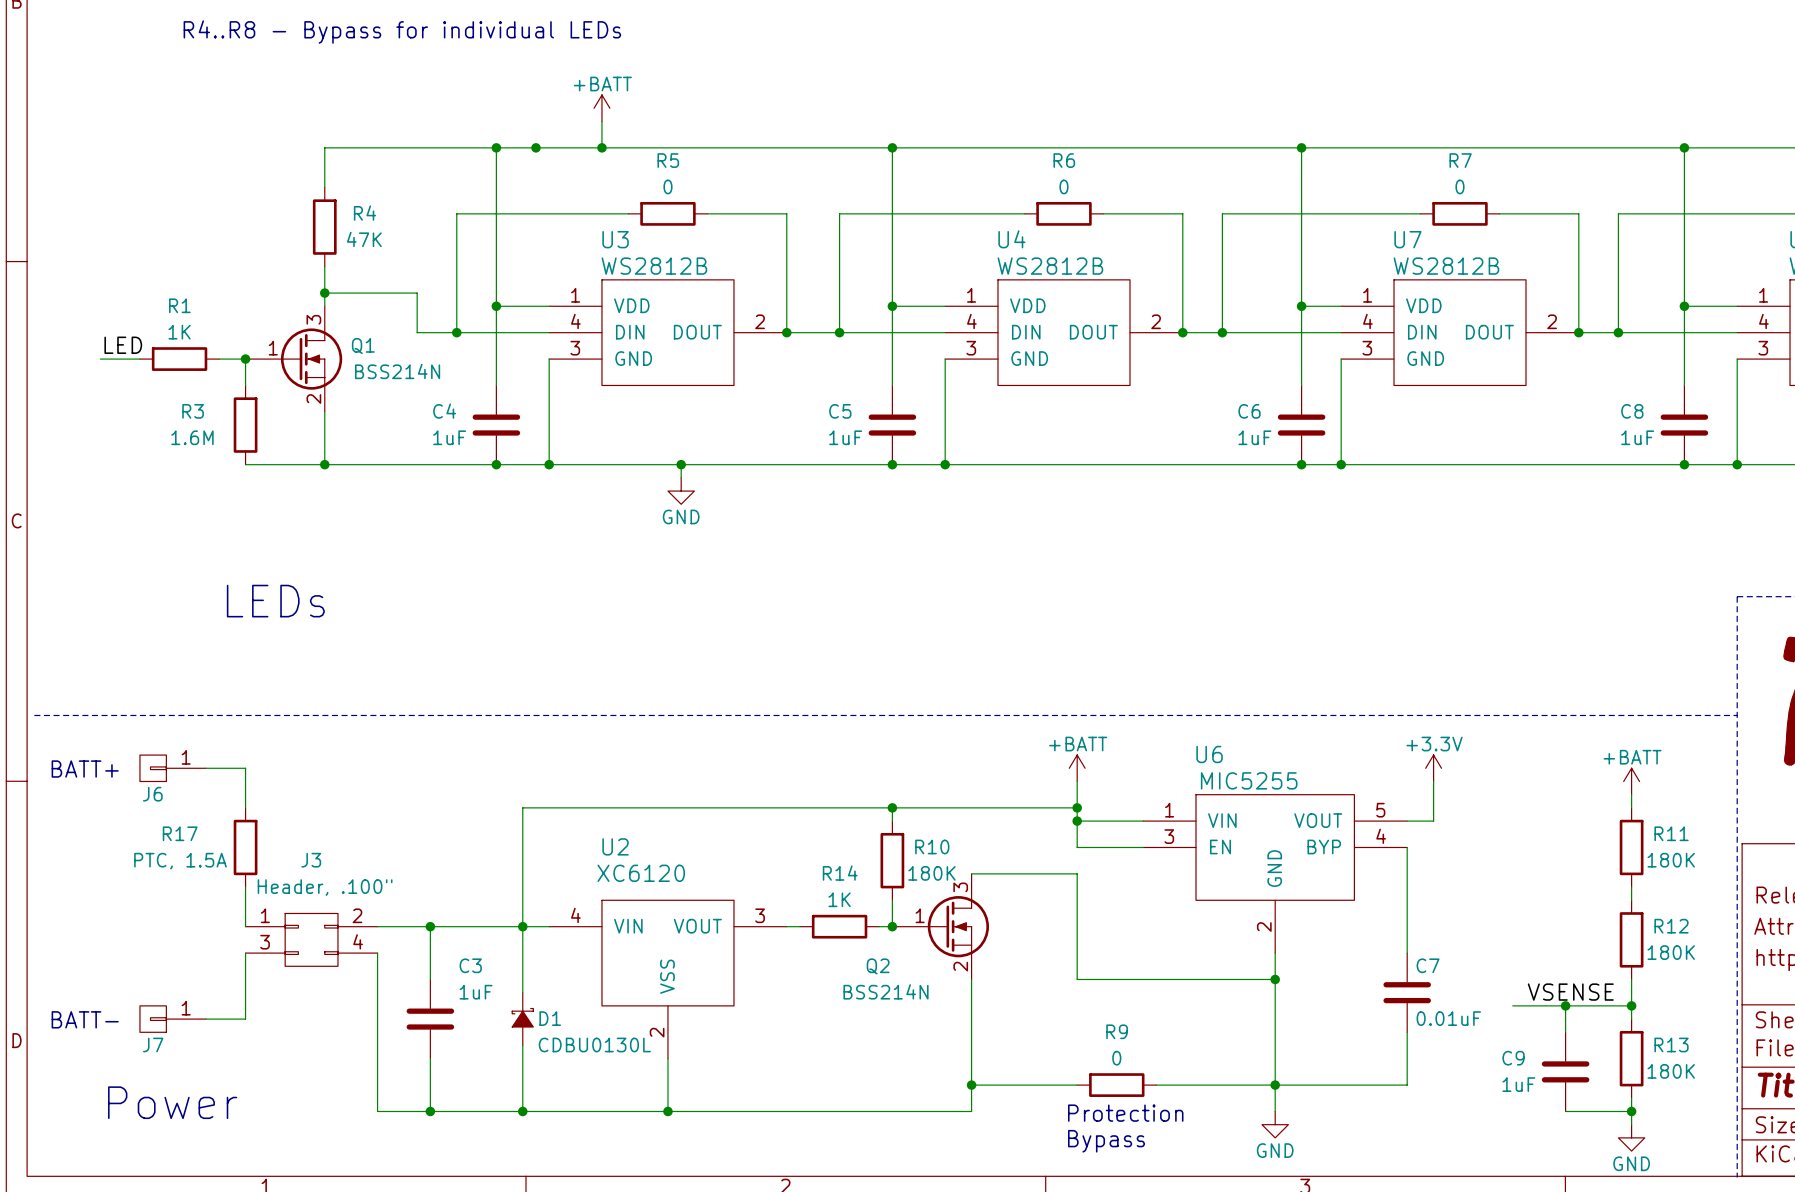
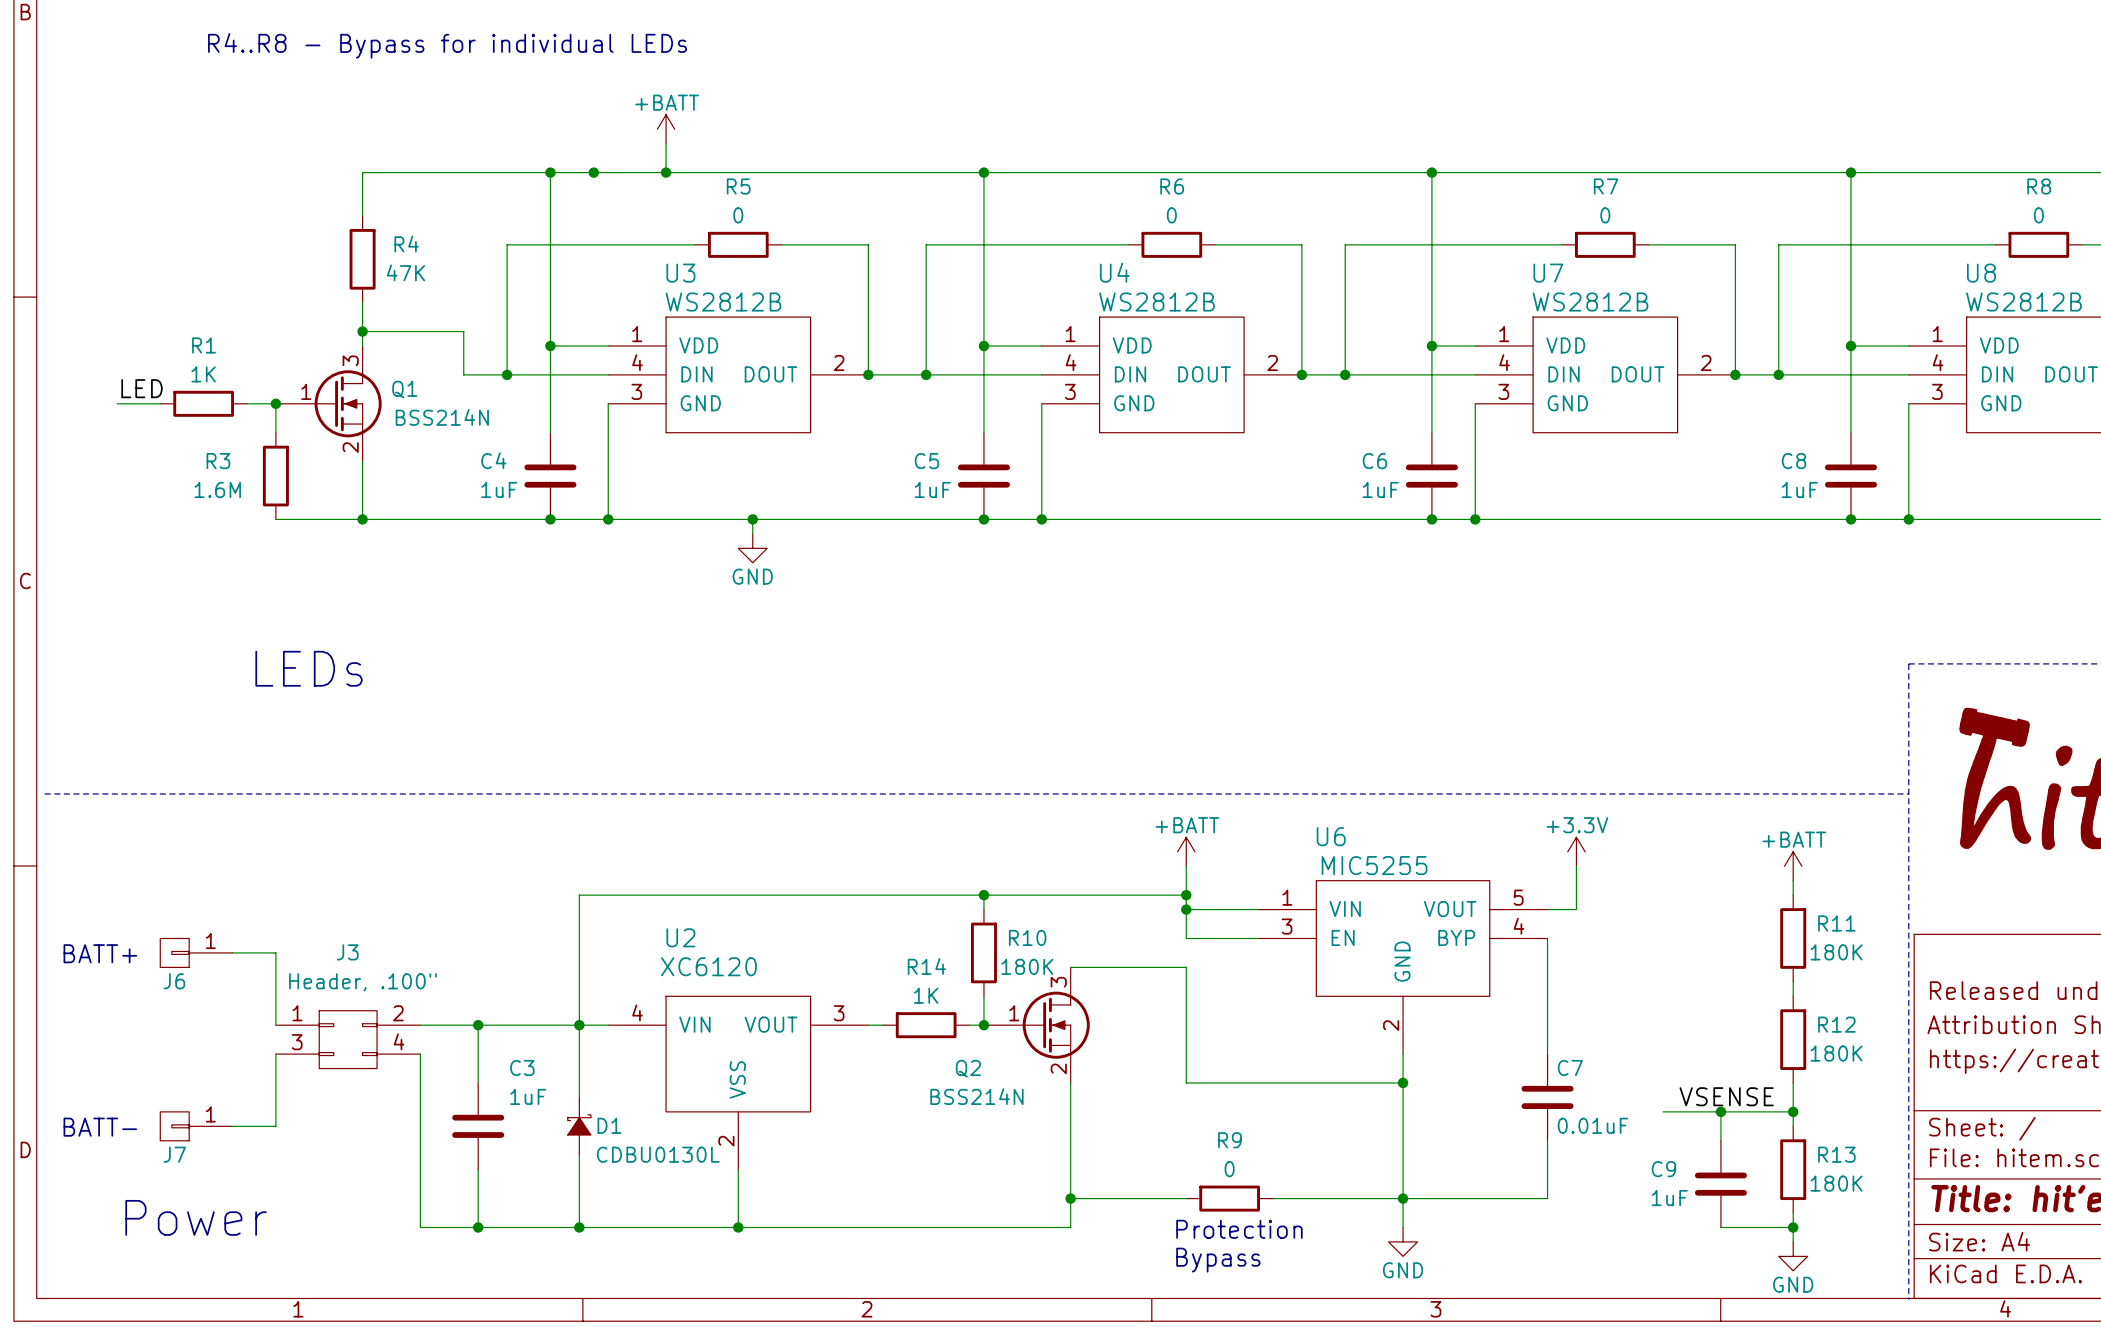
J6 position: (172, 768) -> (196, 952)
wire: (205, 768) (245, 768) (245, 807) -> none
text position: BATT+ (85, 769) -> BATT+ (100, 953)
R17: PTC, 1.5A (245, 847) -> none
wire: none -> (232, 952) (275, 952) (275, 981)

